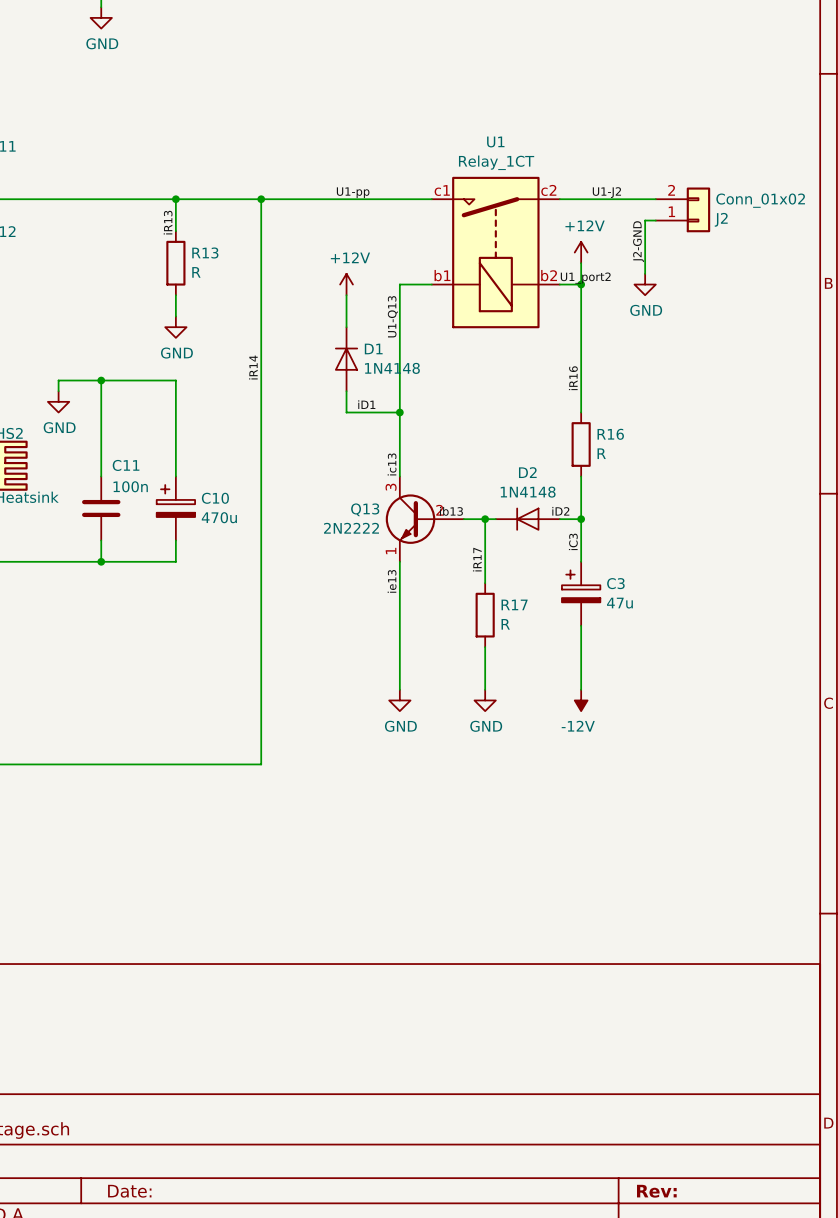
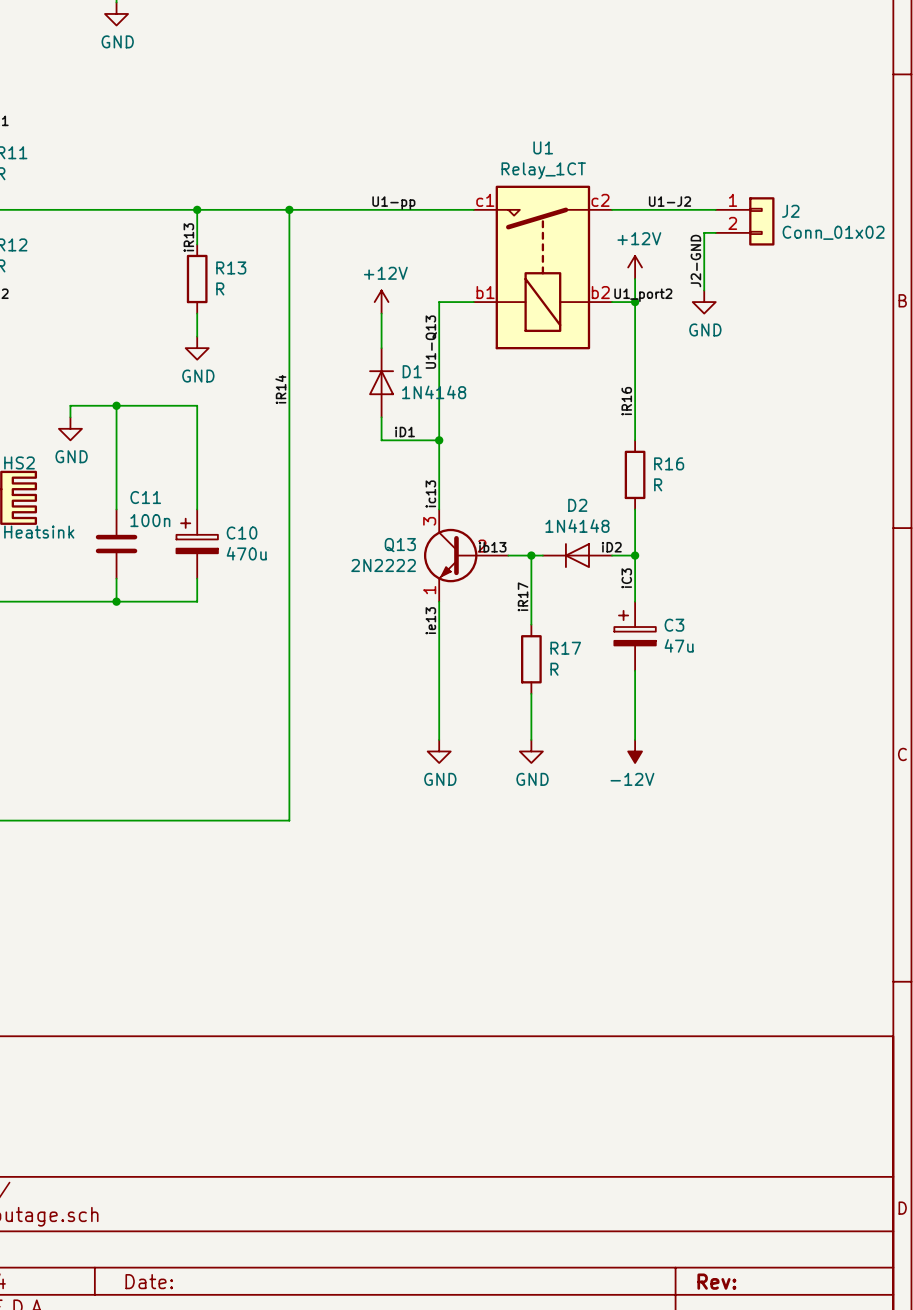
J2 flip: as is (698, 209) -> up-down (761, 221)

